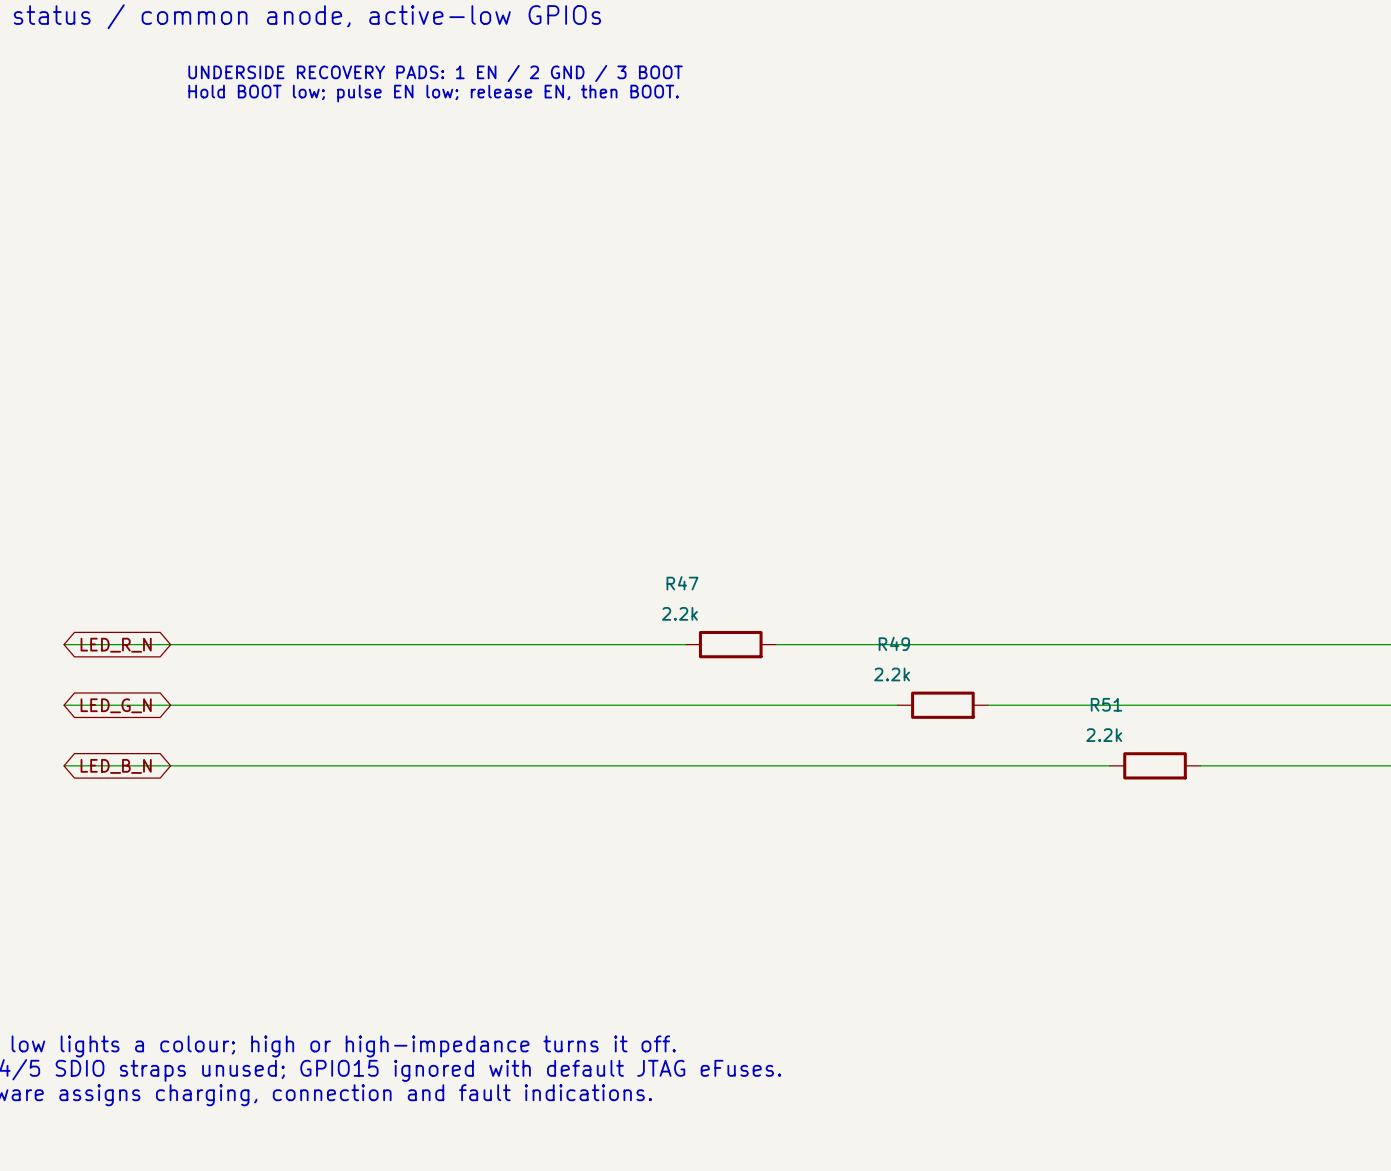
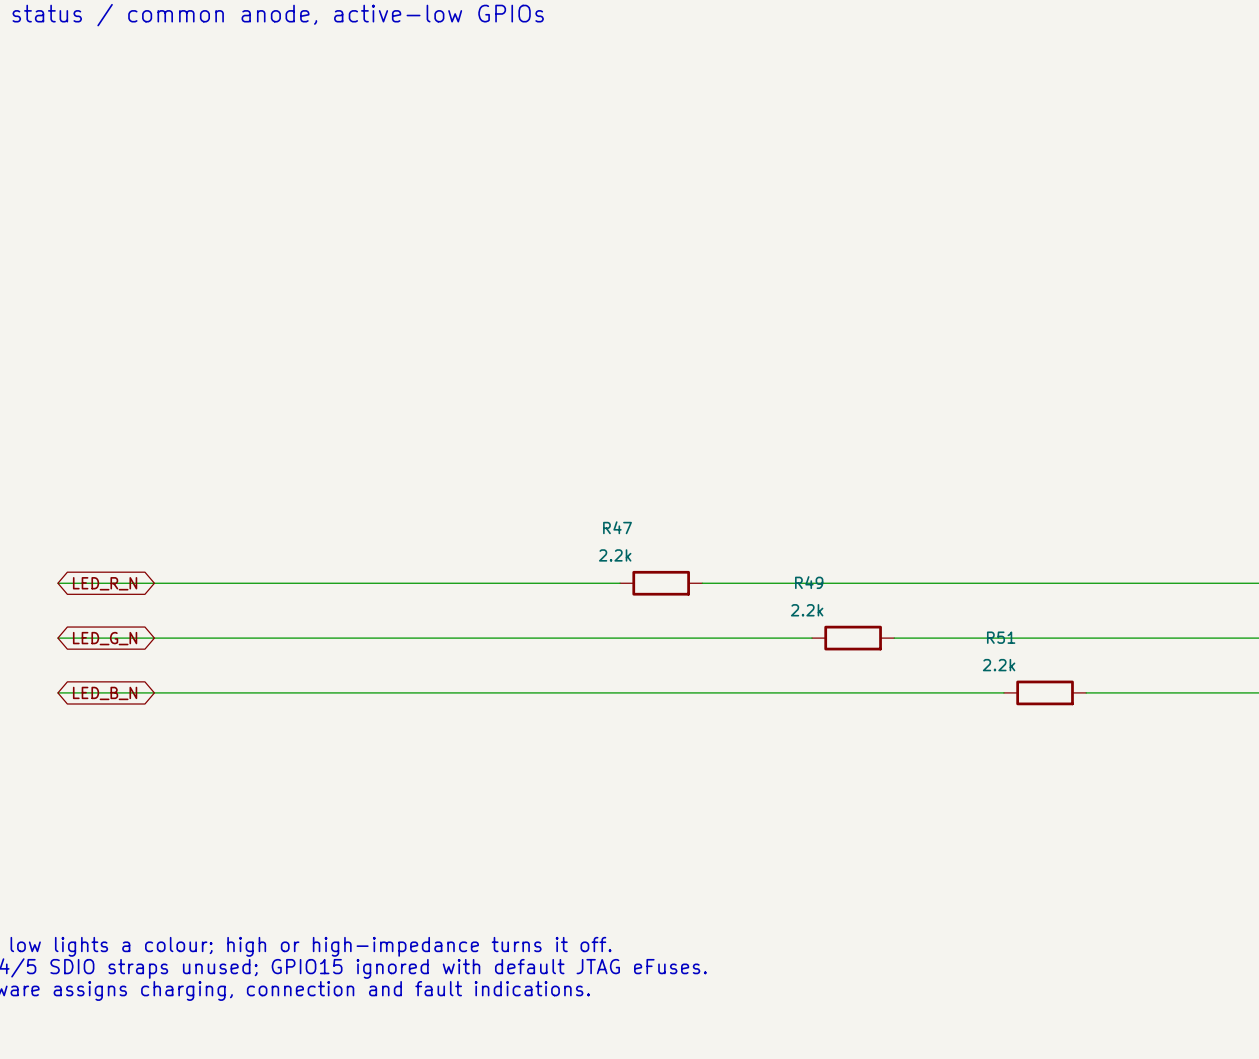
text: UNDERSIDE RECOVERY PADS: 1 EN / 2 GND / 3 BOOT (435, 73) -> none
text: Hold BOOT low; pulse EN low; release EN, then BOOT. (433, 93) -> none

